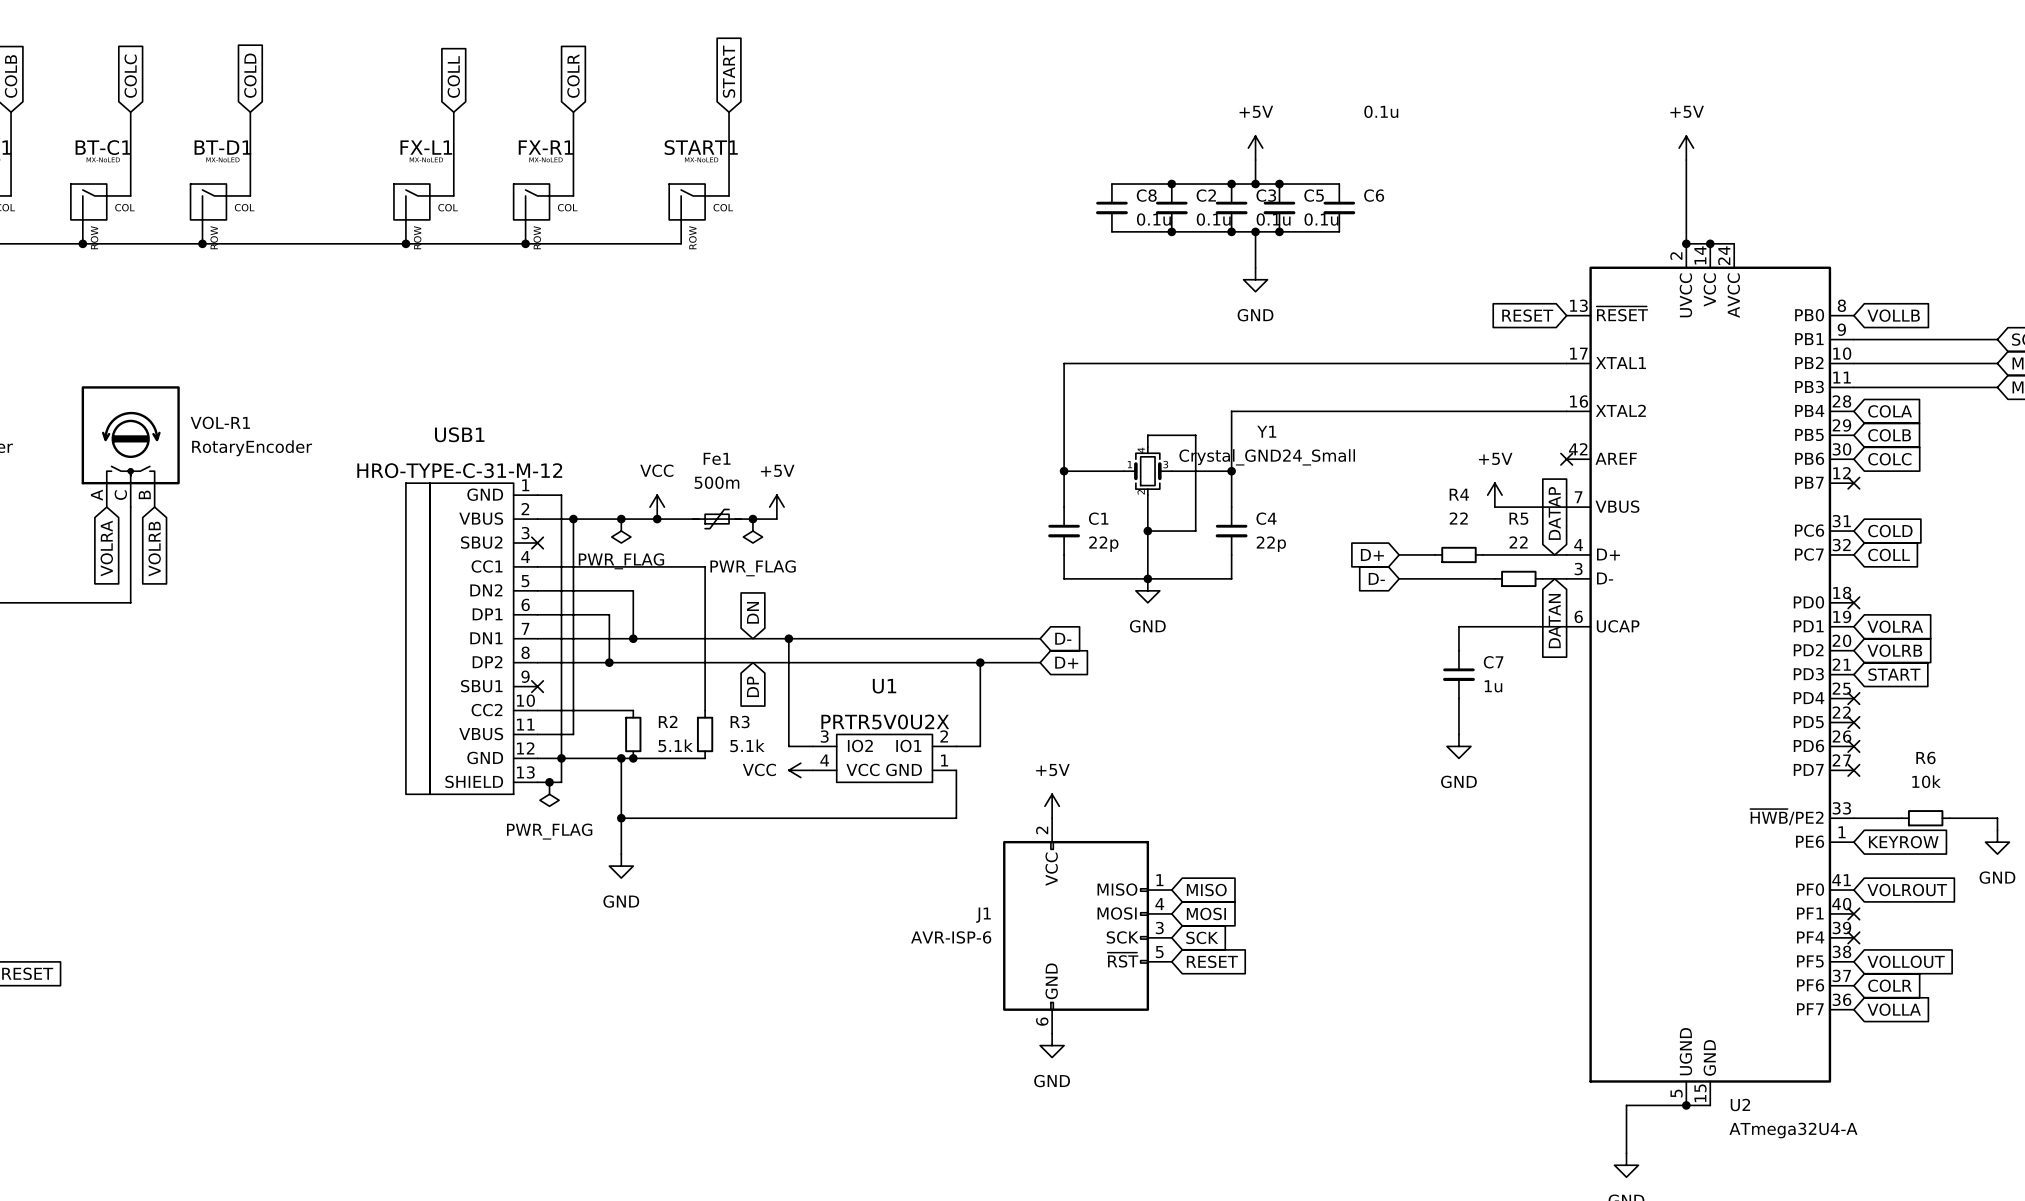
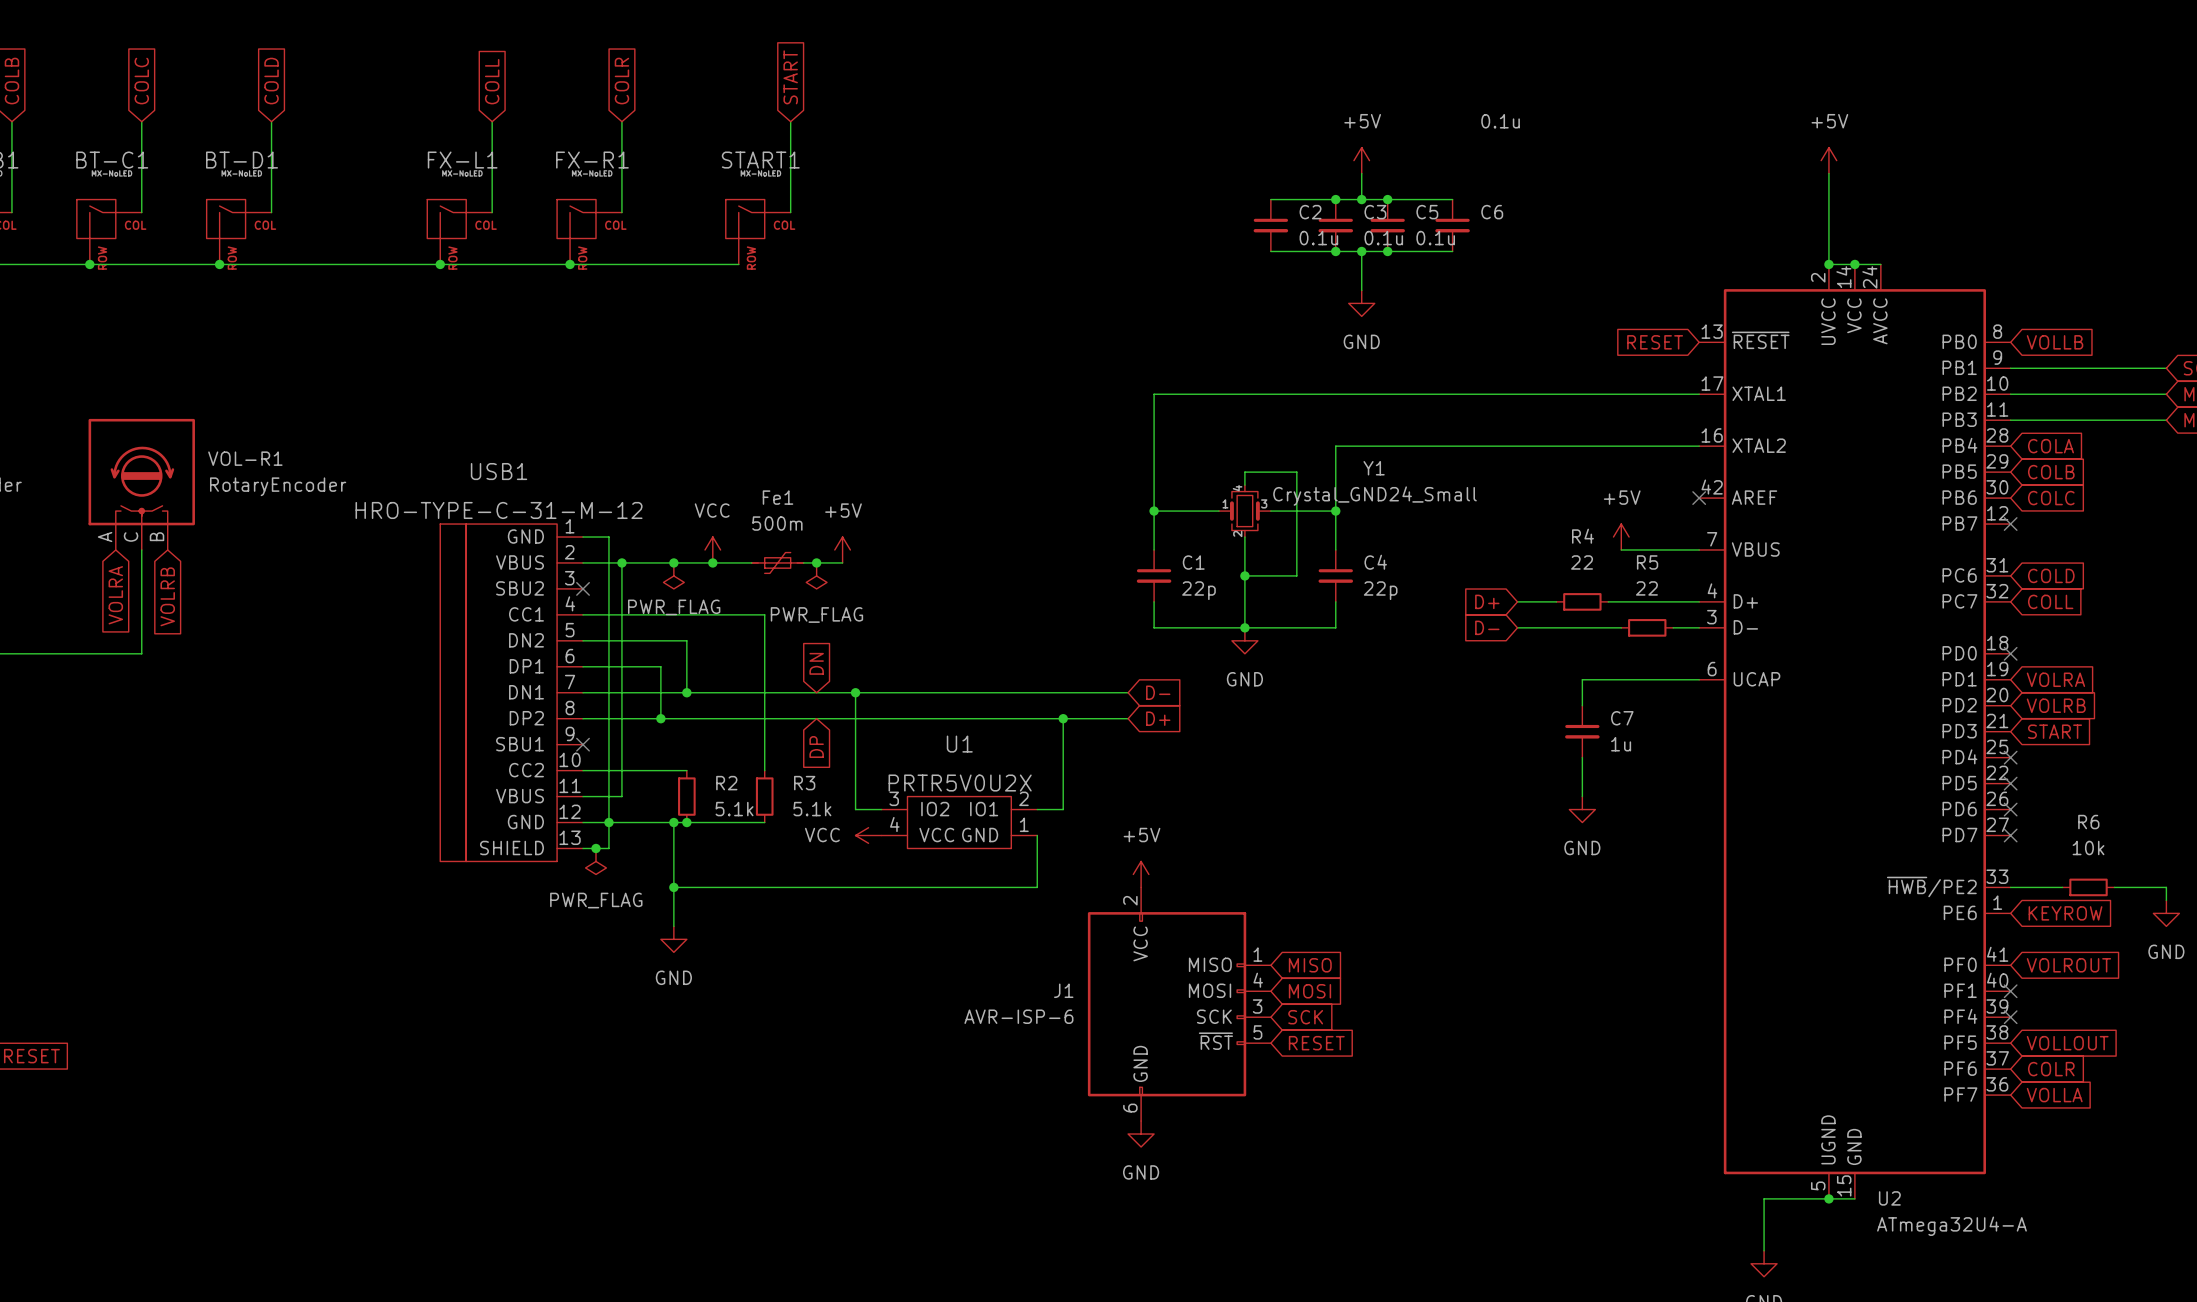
wire: (1111, 184) (1171, 184) -> none
junction: (1171, 184) -> none
C8: 0.1u (1111, 207) -> none
wire: (1111, 231) (1171, 231) -> none
junction: (1171, 231) -> none
global label: DATAP (1554, 513) -> none
global label: DATAN (1554, 621) -> none

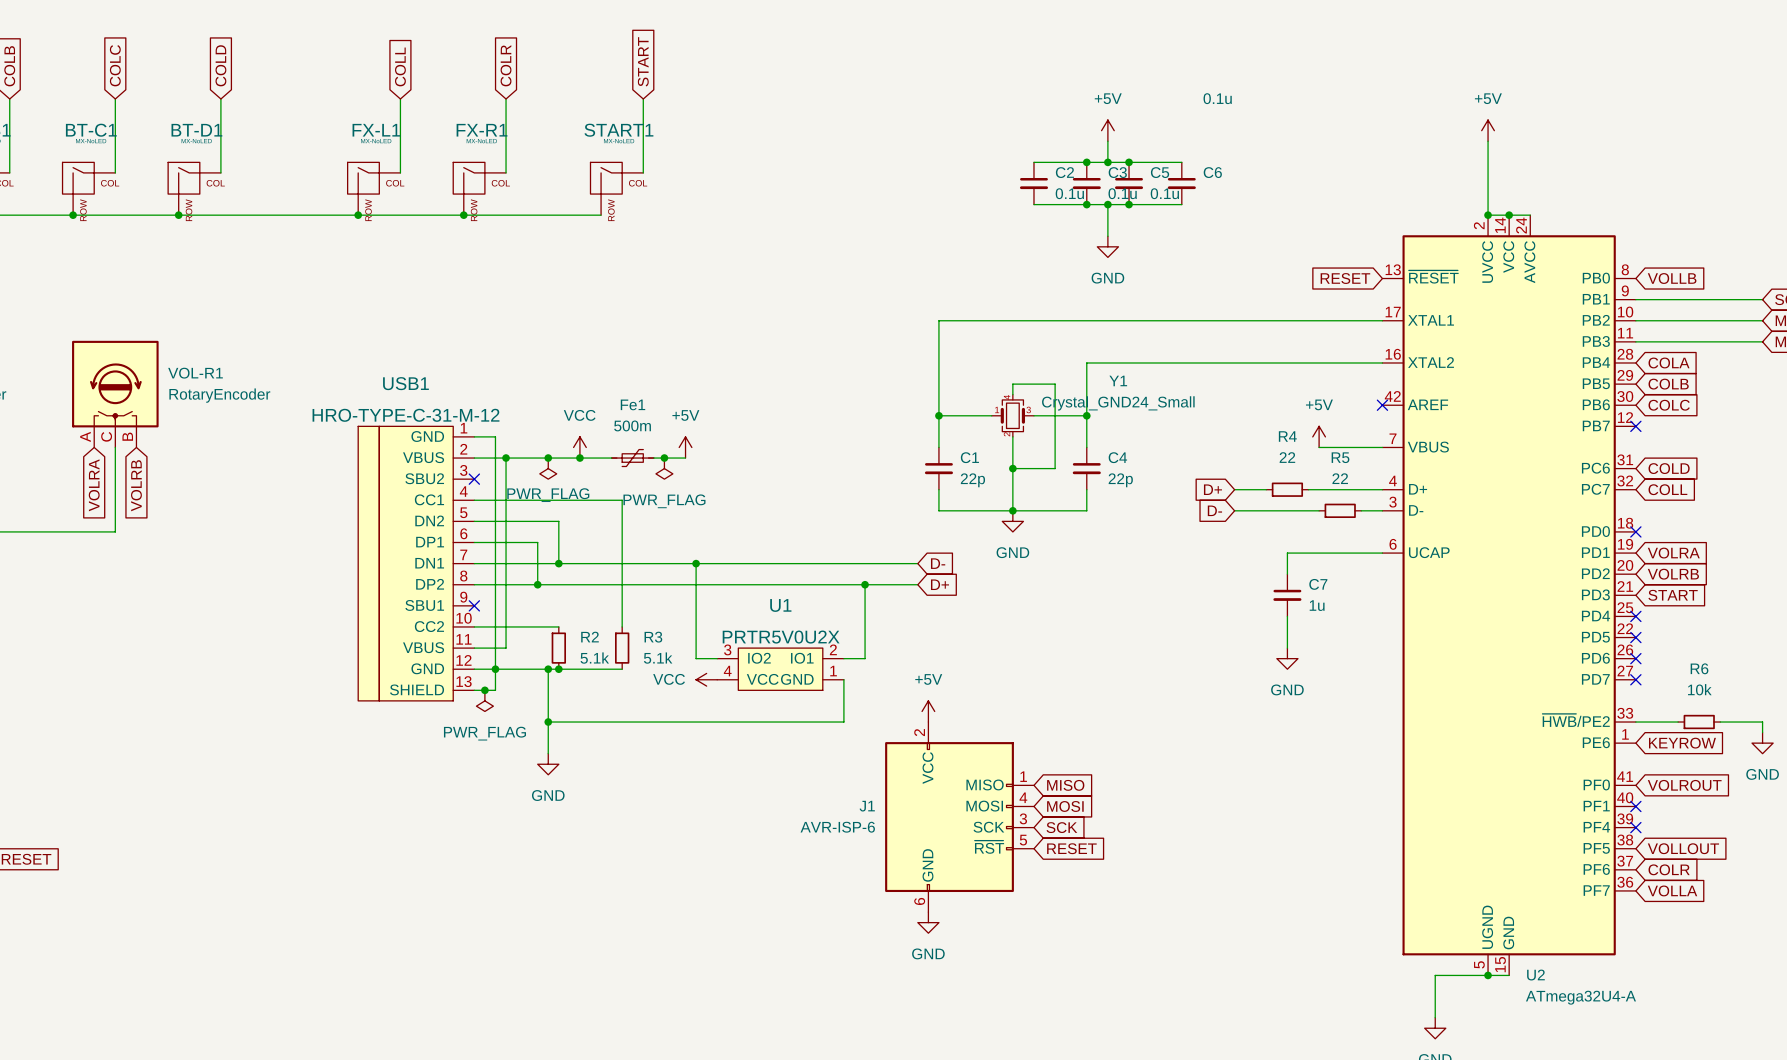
global label: DN (816, 663) -> none
global label: DP (816, 747) -> none

